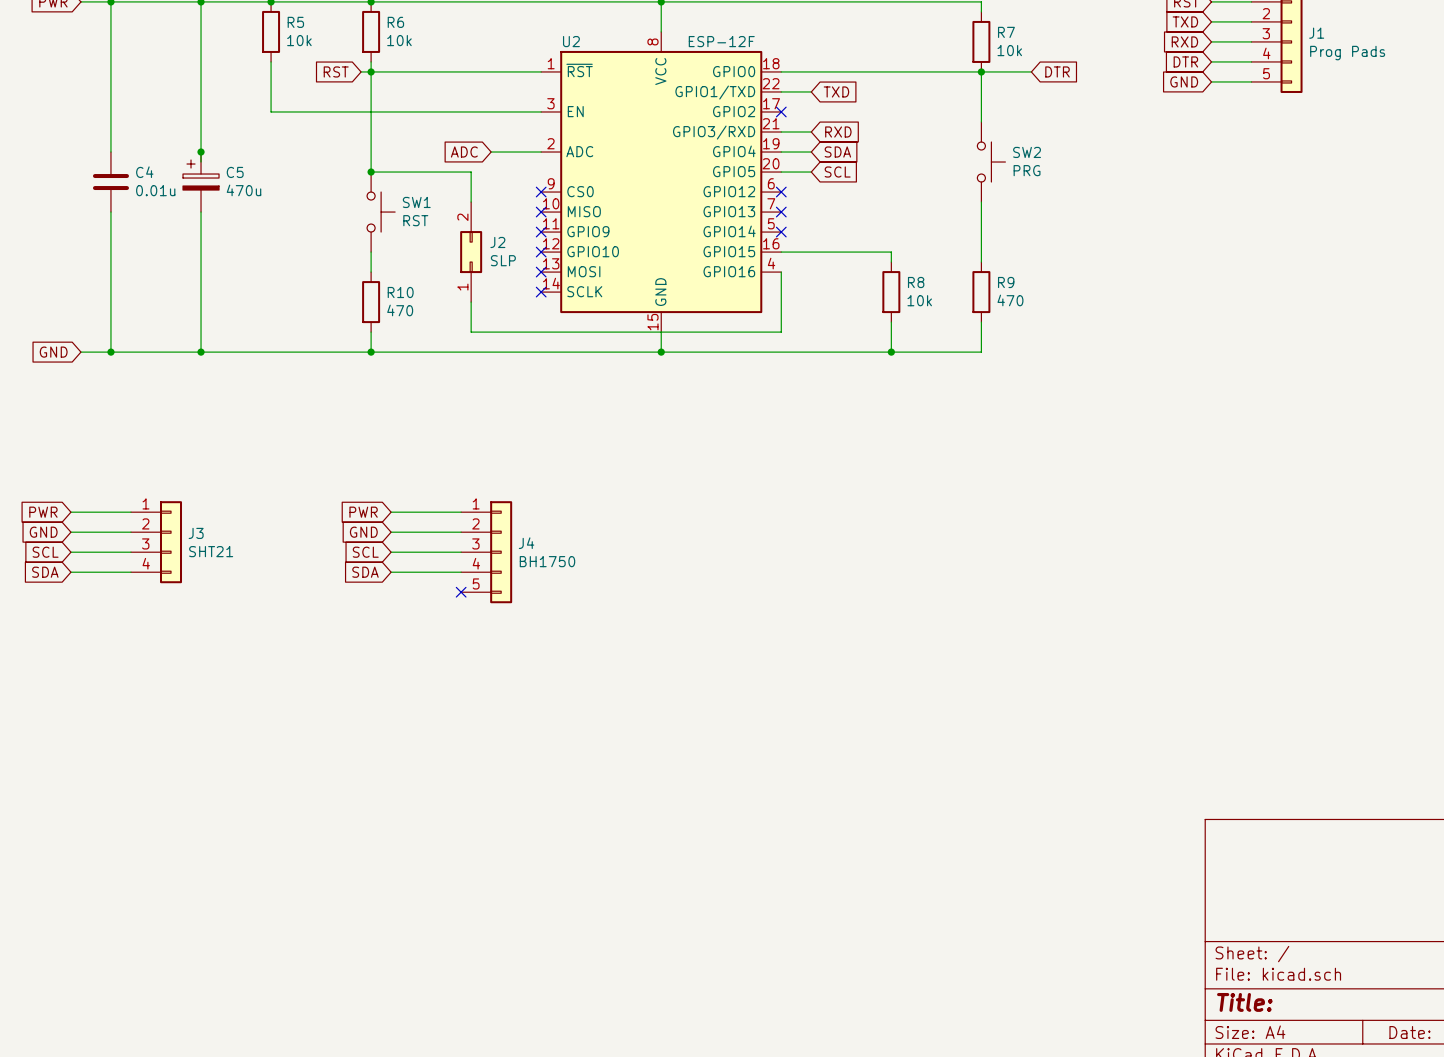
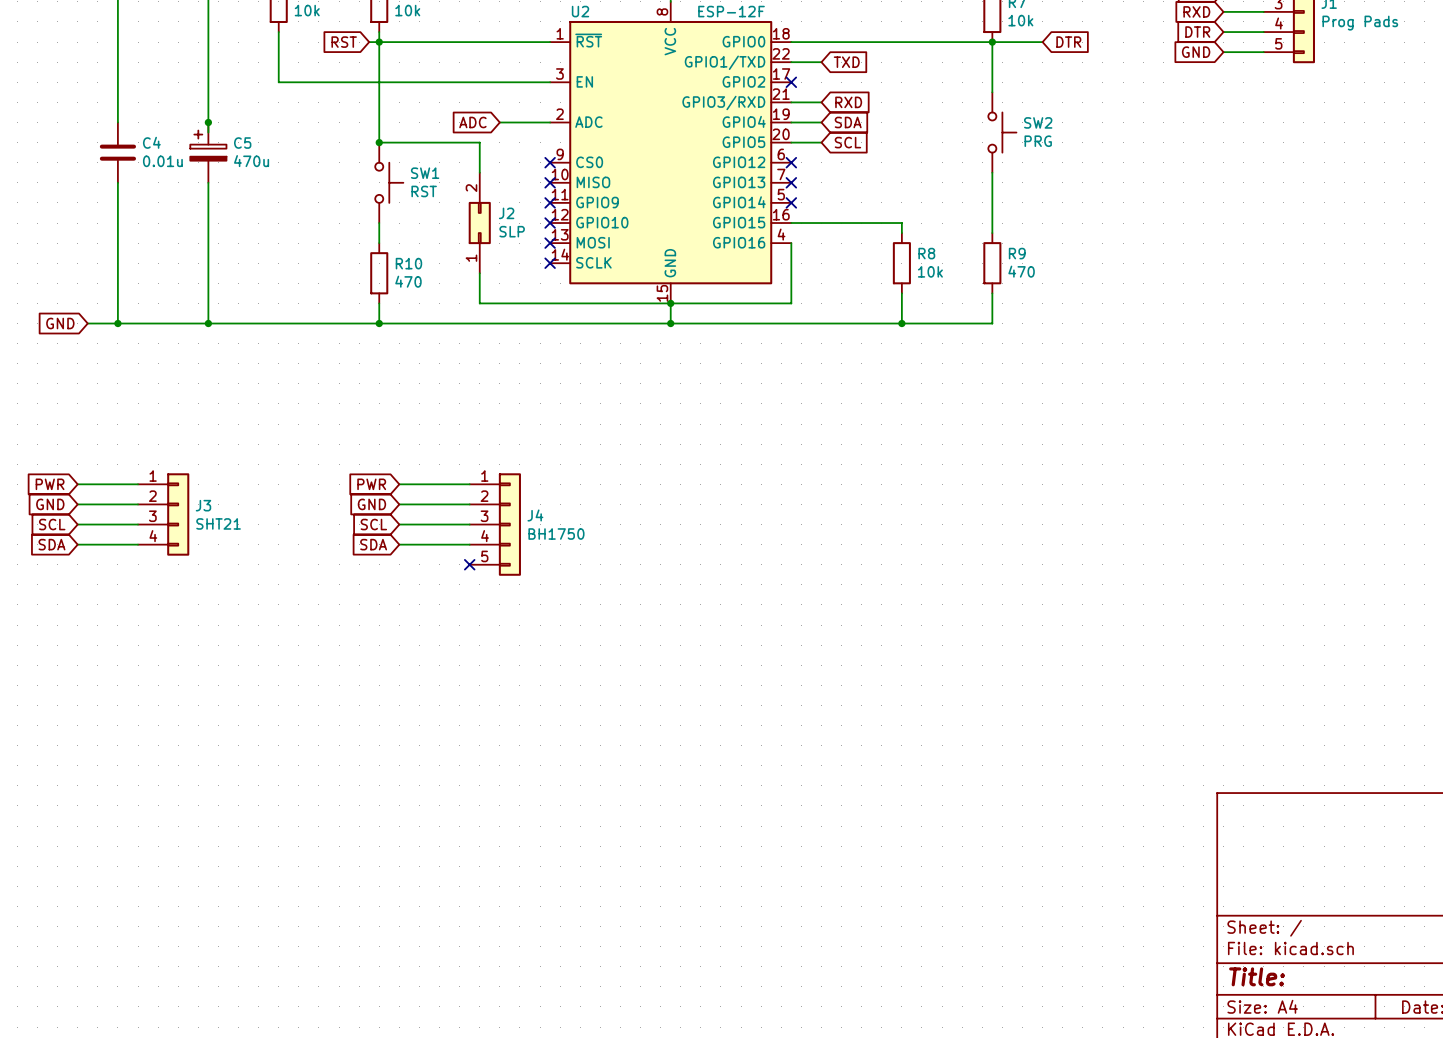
junction: none -> (670, 303)

